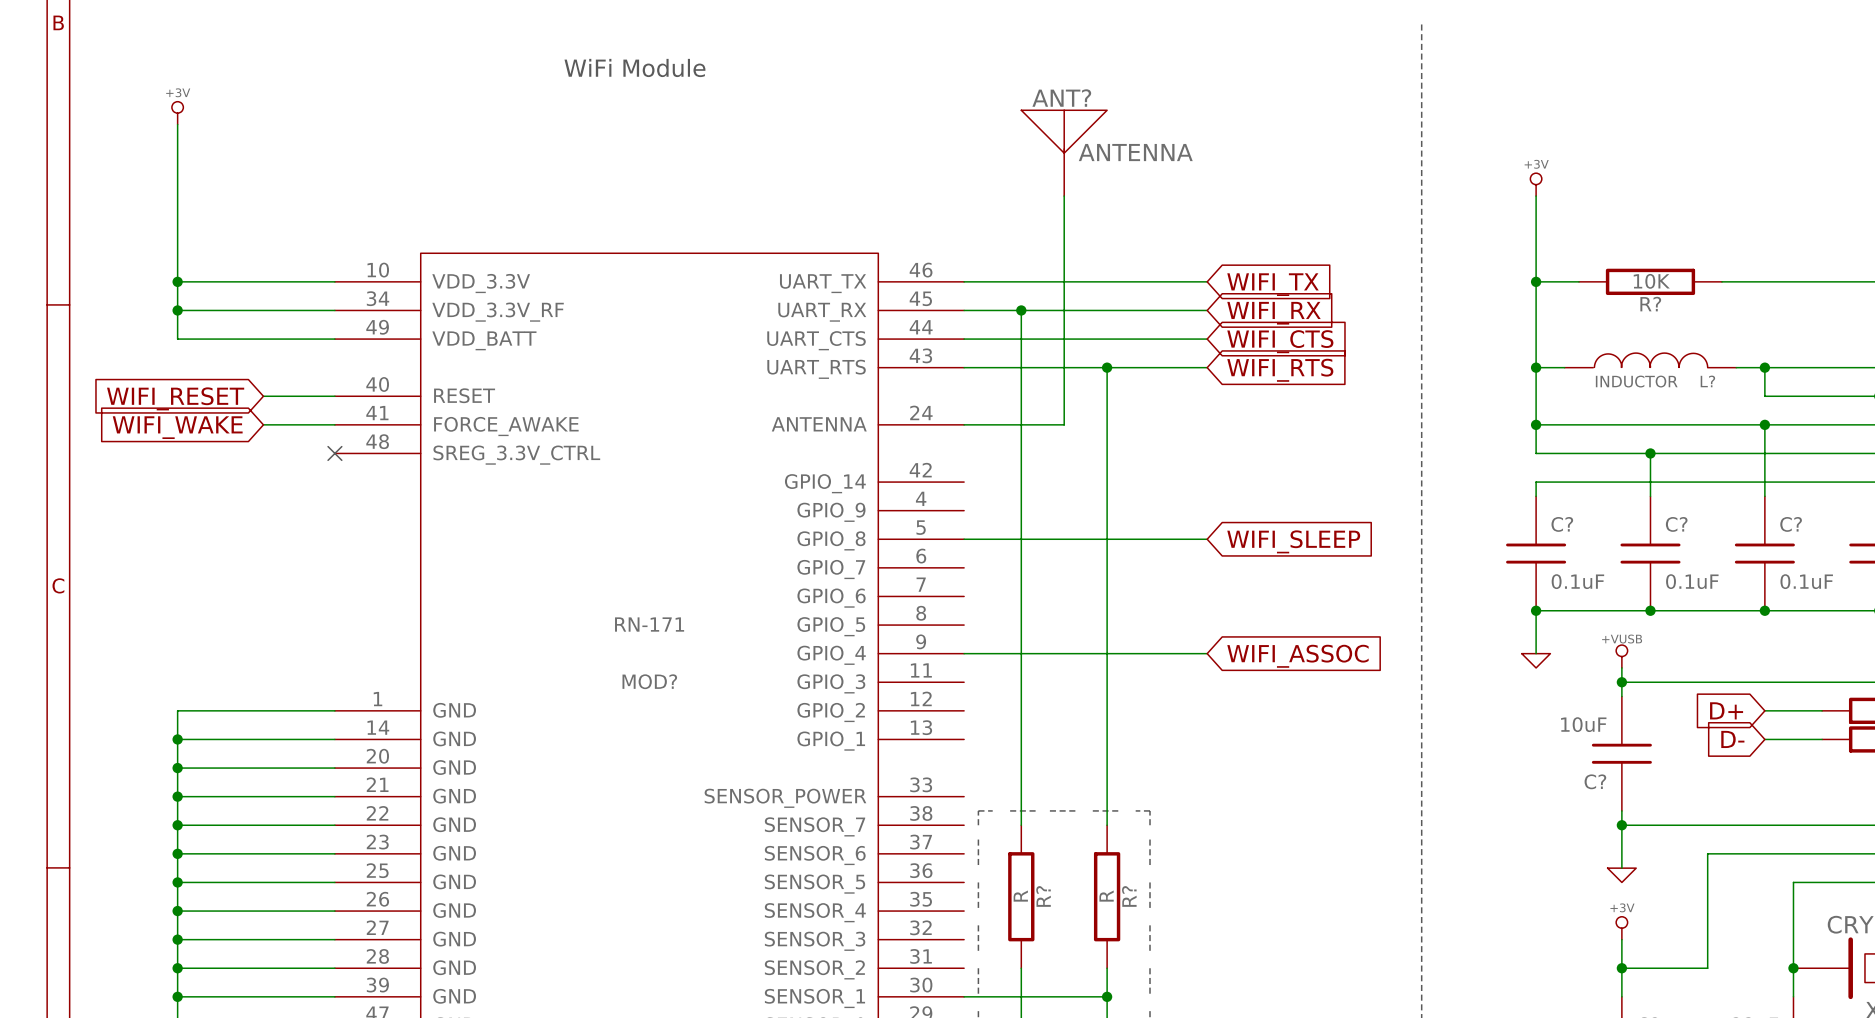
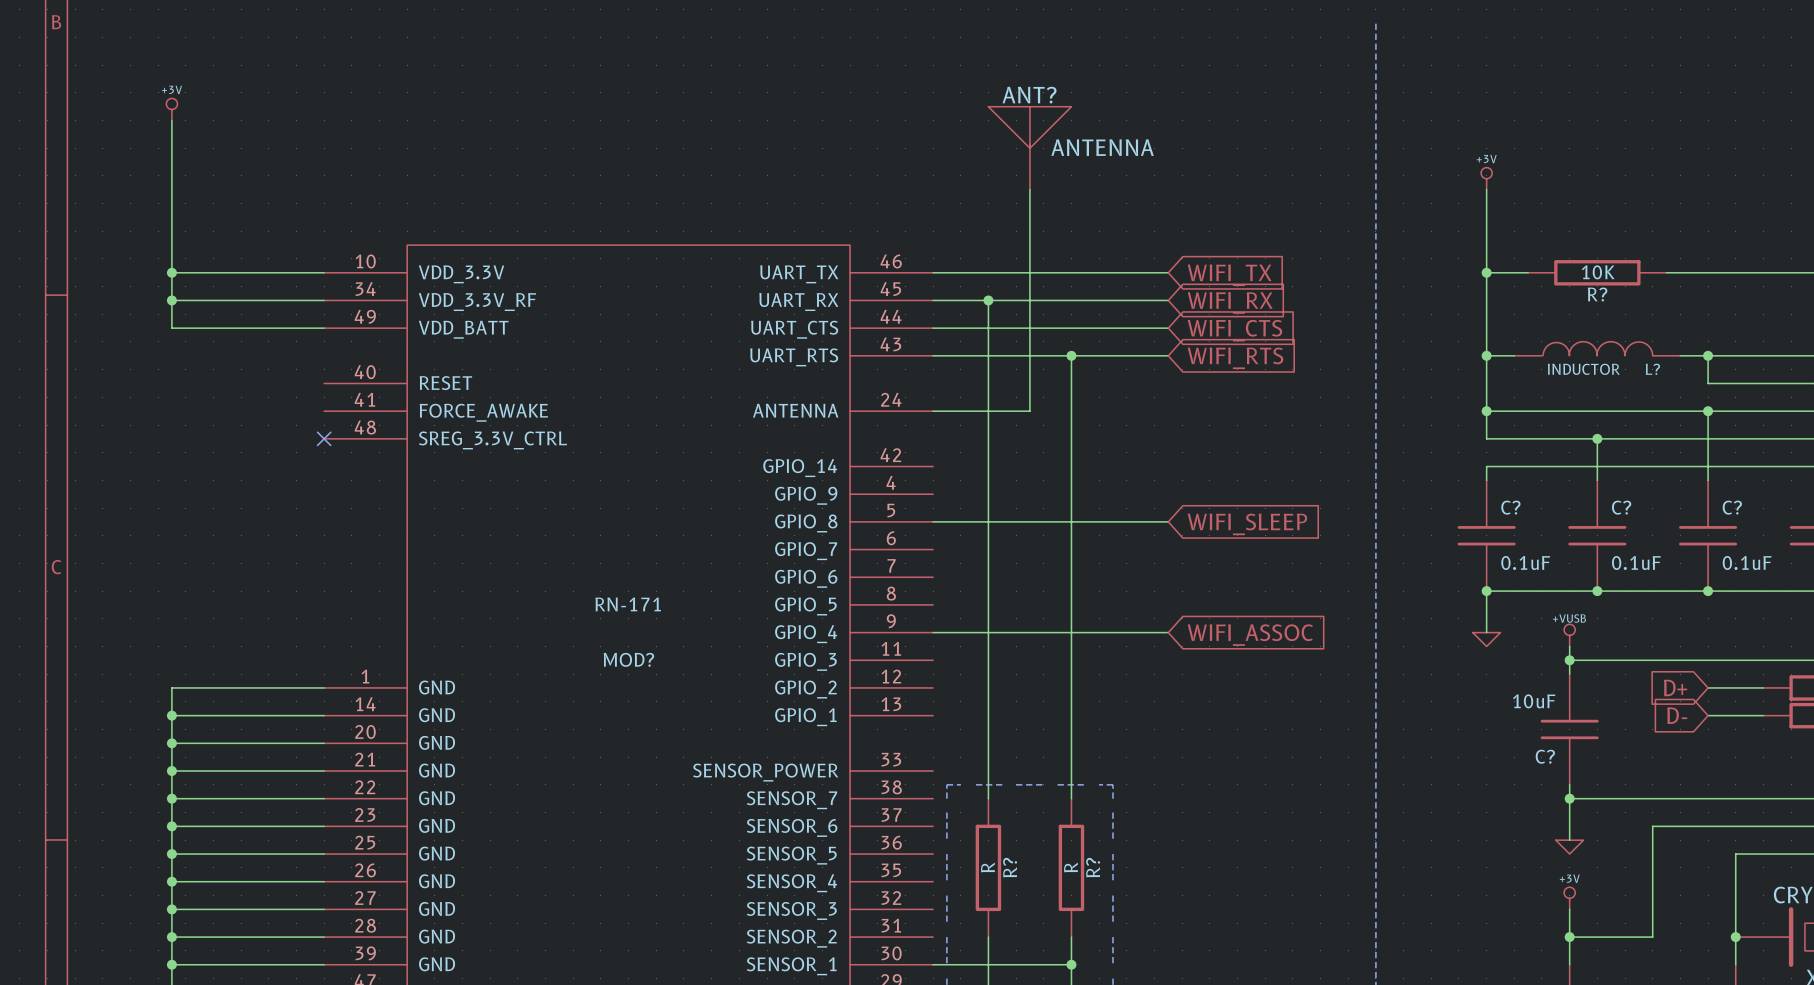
text: WiFi Module (634, 67) -> none
wire: (263, 396) (334, 396) -> none
global label: WIFI_RESET (175, 398) -> none
wire: (263, 424) (334, 424) -> none
global label: WIFI_WAKE (177, 427) -> none

